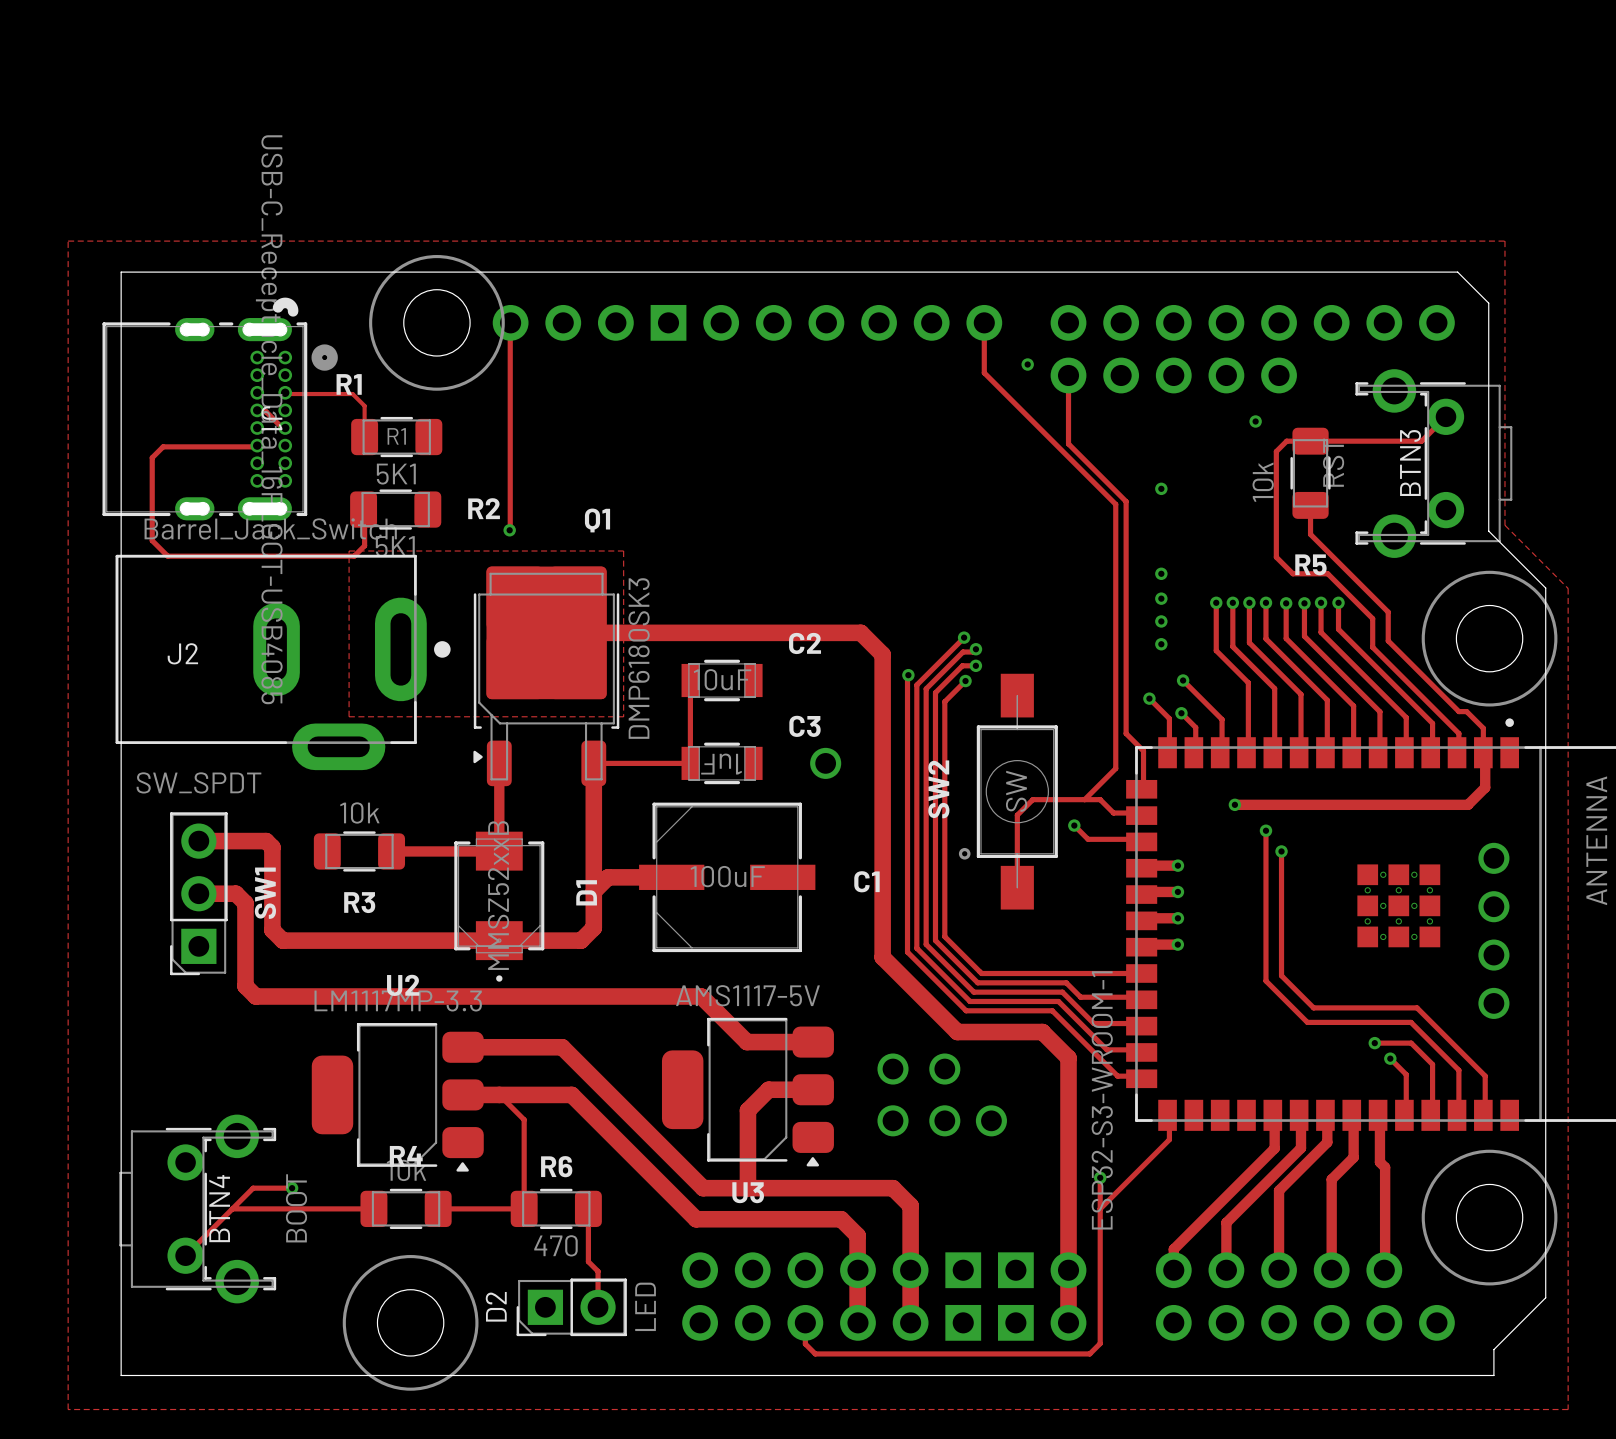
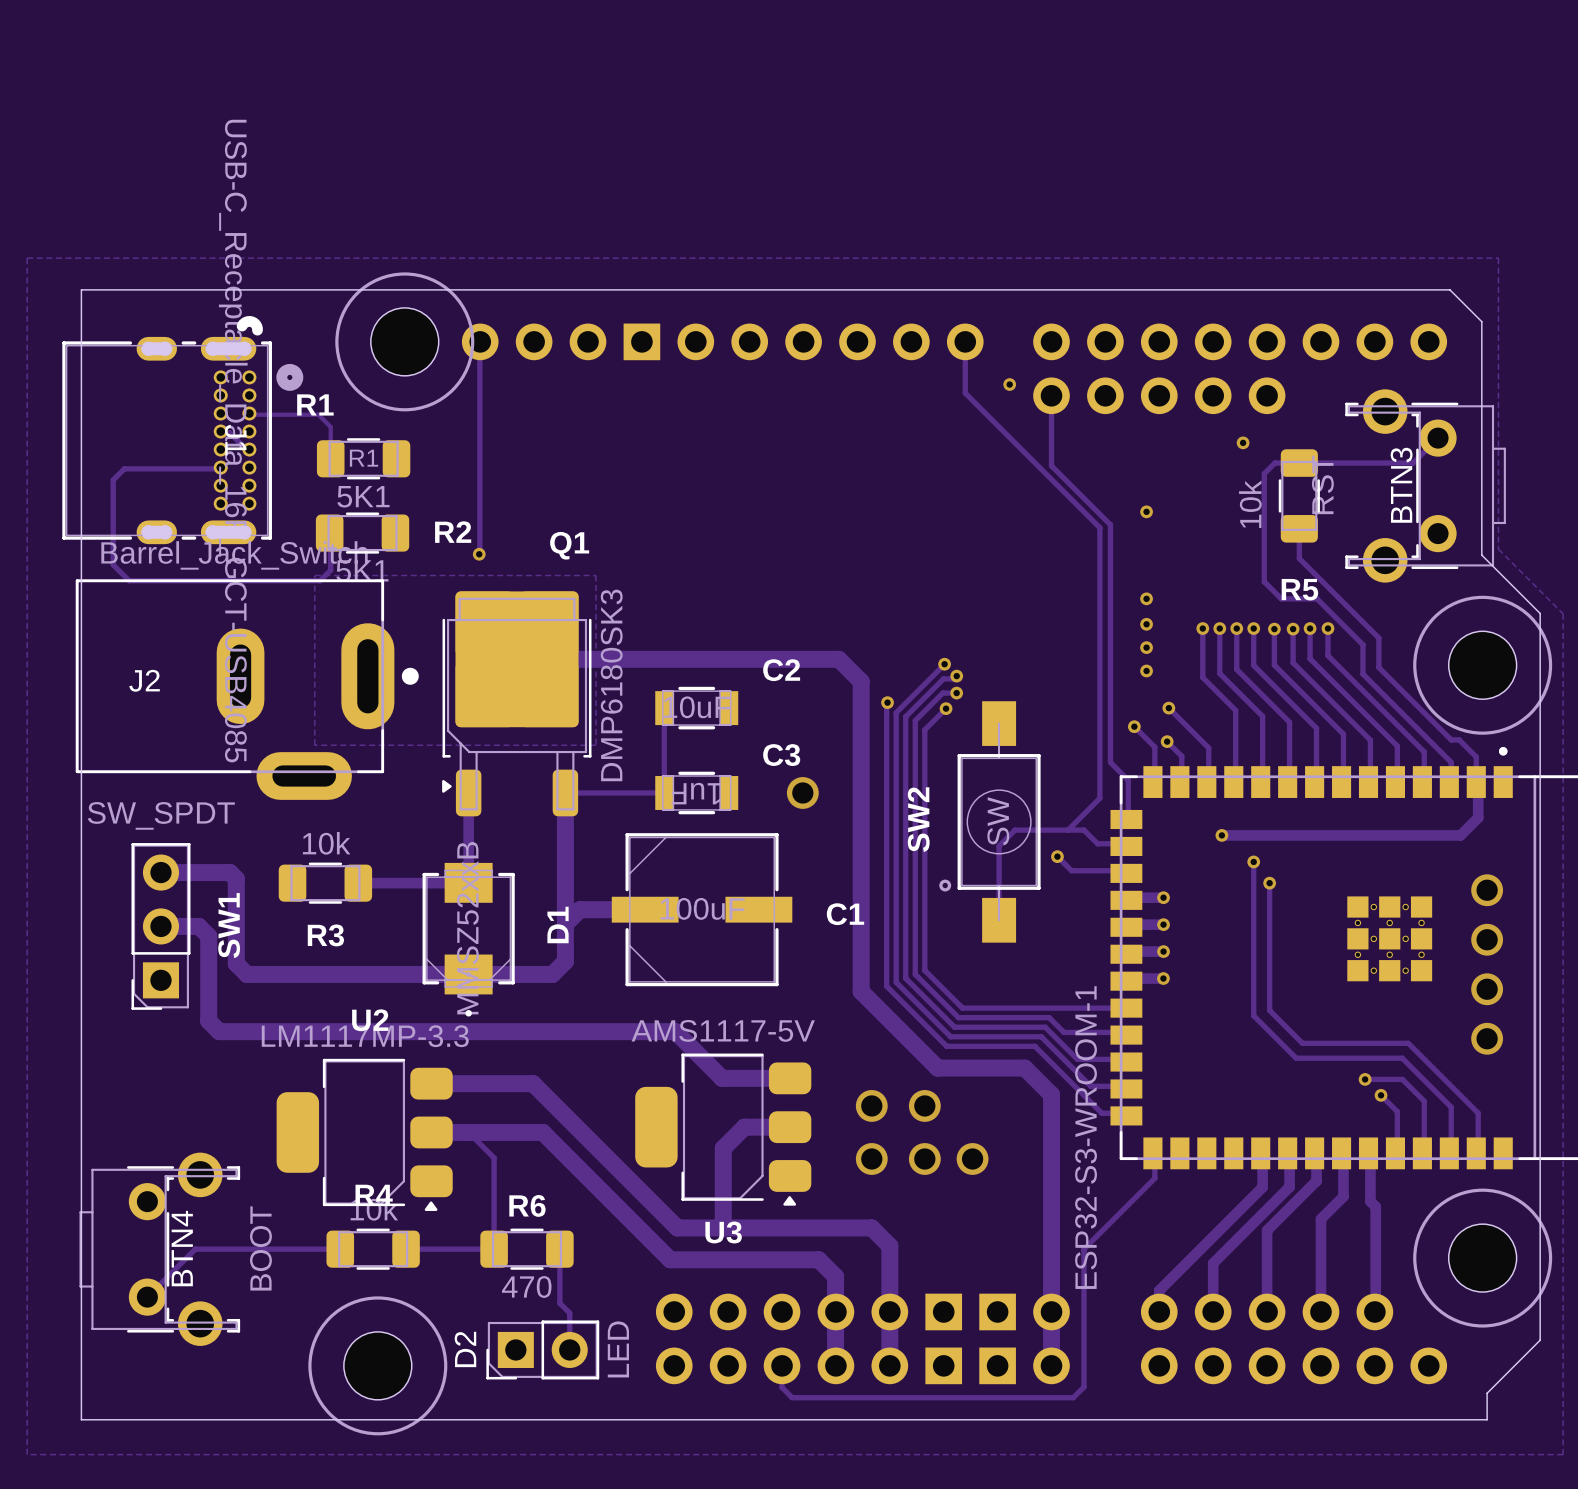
track: (1100, 1177) (1100, 1208) -> none
via: (1100, 1177) -> none
track: (292, 1188) (253, 1188) (232, 1208) -> none
via: (292, 1188) -> none

